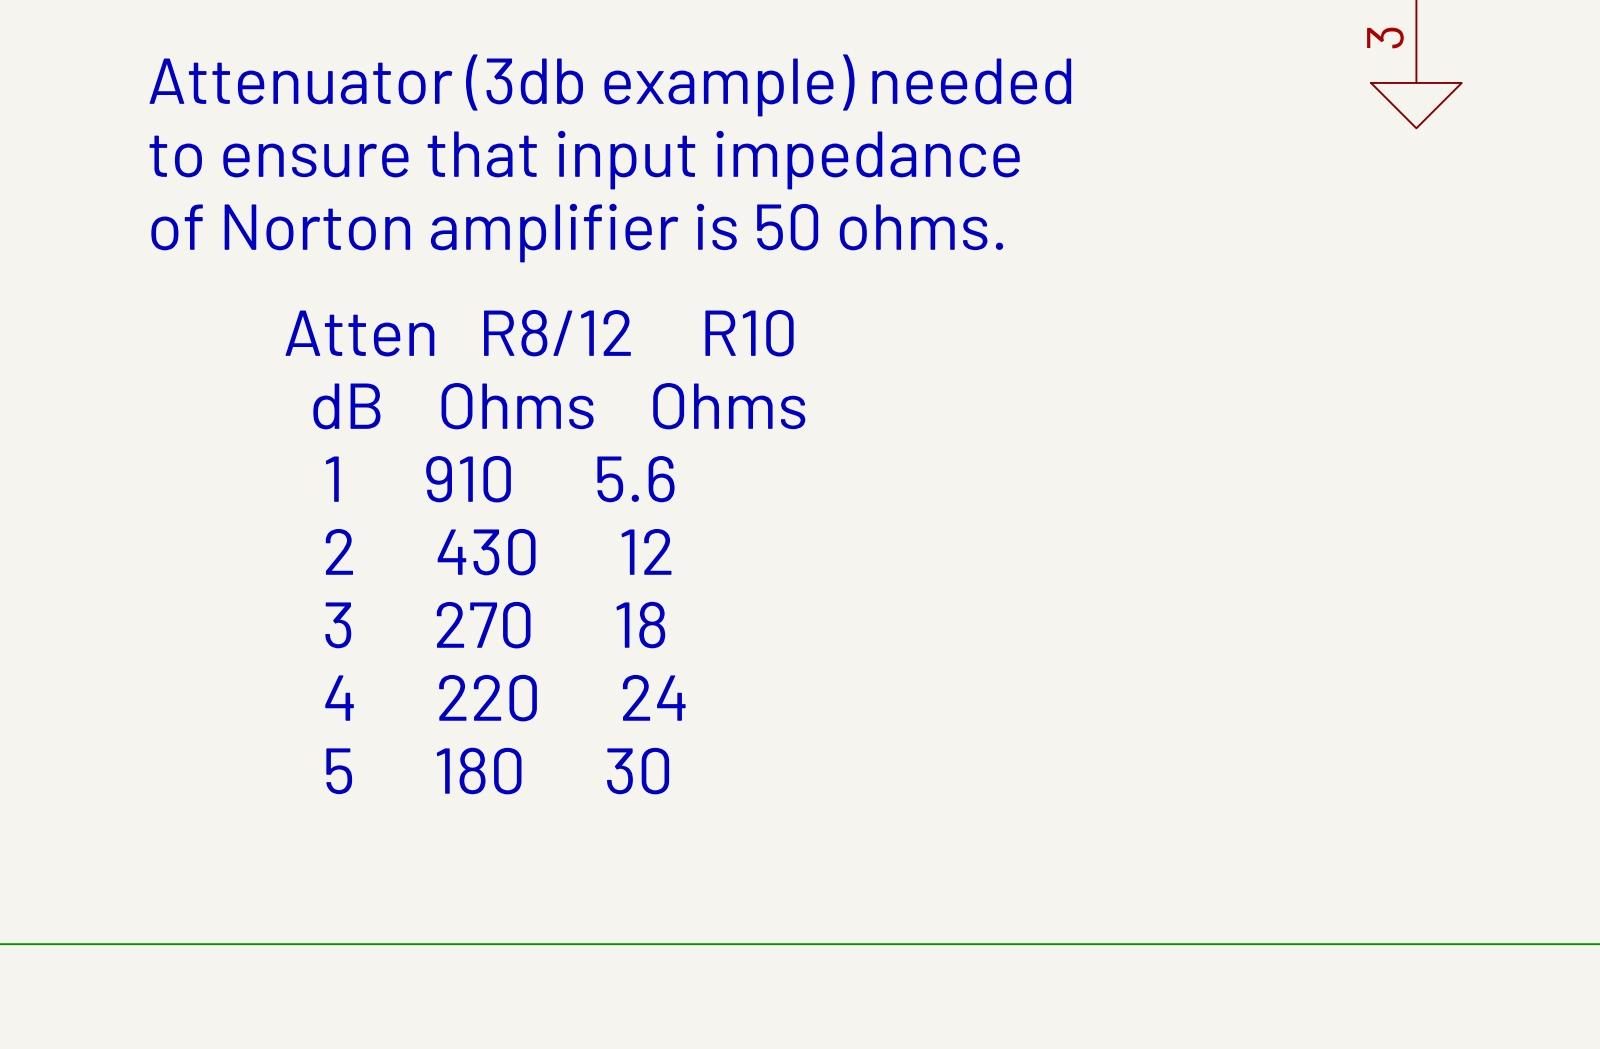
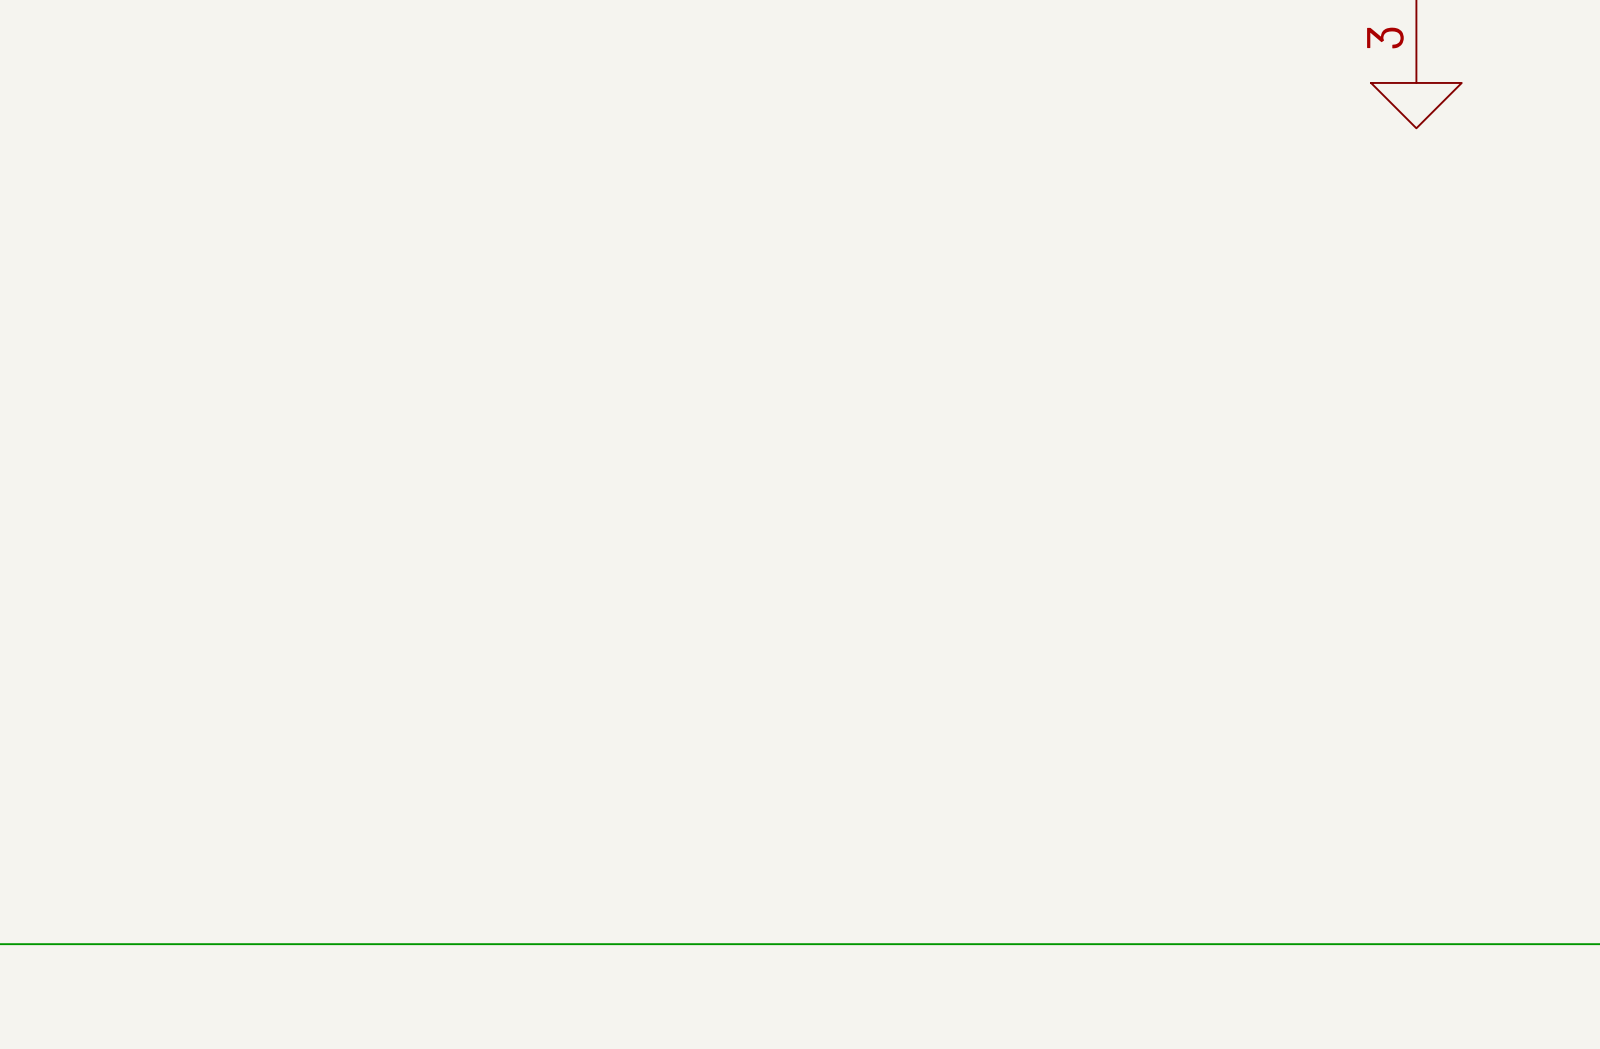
text: Attenuator (3db example) needed (610, 85) -> none
text: to ensure that input impedance (584, 160) -> none
text: of Norton amplifier is 50 ohms. (577, 233) -> none
text: Atten R8/12 R10 (539, 333) -> none
text: dB Ohms Ohms (559, 406) -> none
text: 1 910 5.6 (500, 479) -> none
text: 2 430 12 (498, 552) -> none
text: 3 270 18 (495, 625) -> none
text: 4 220 24 (505, 698) -> none
text: 5 180 30 (497, 771) -> none

